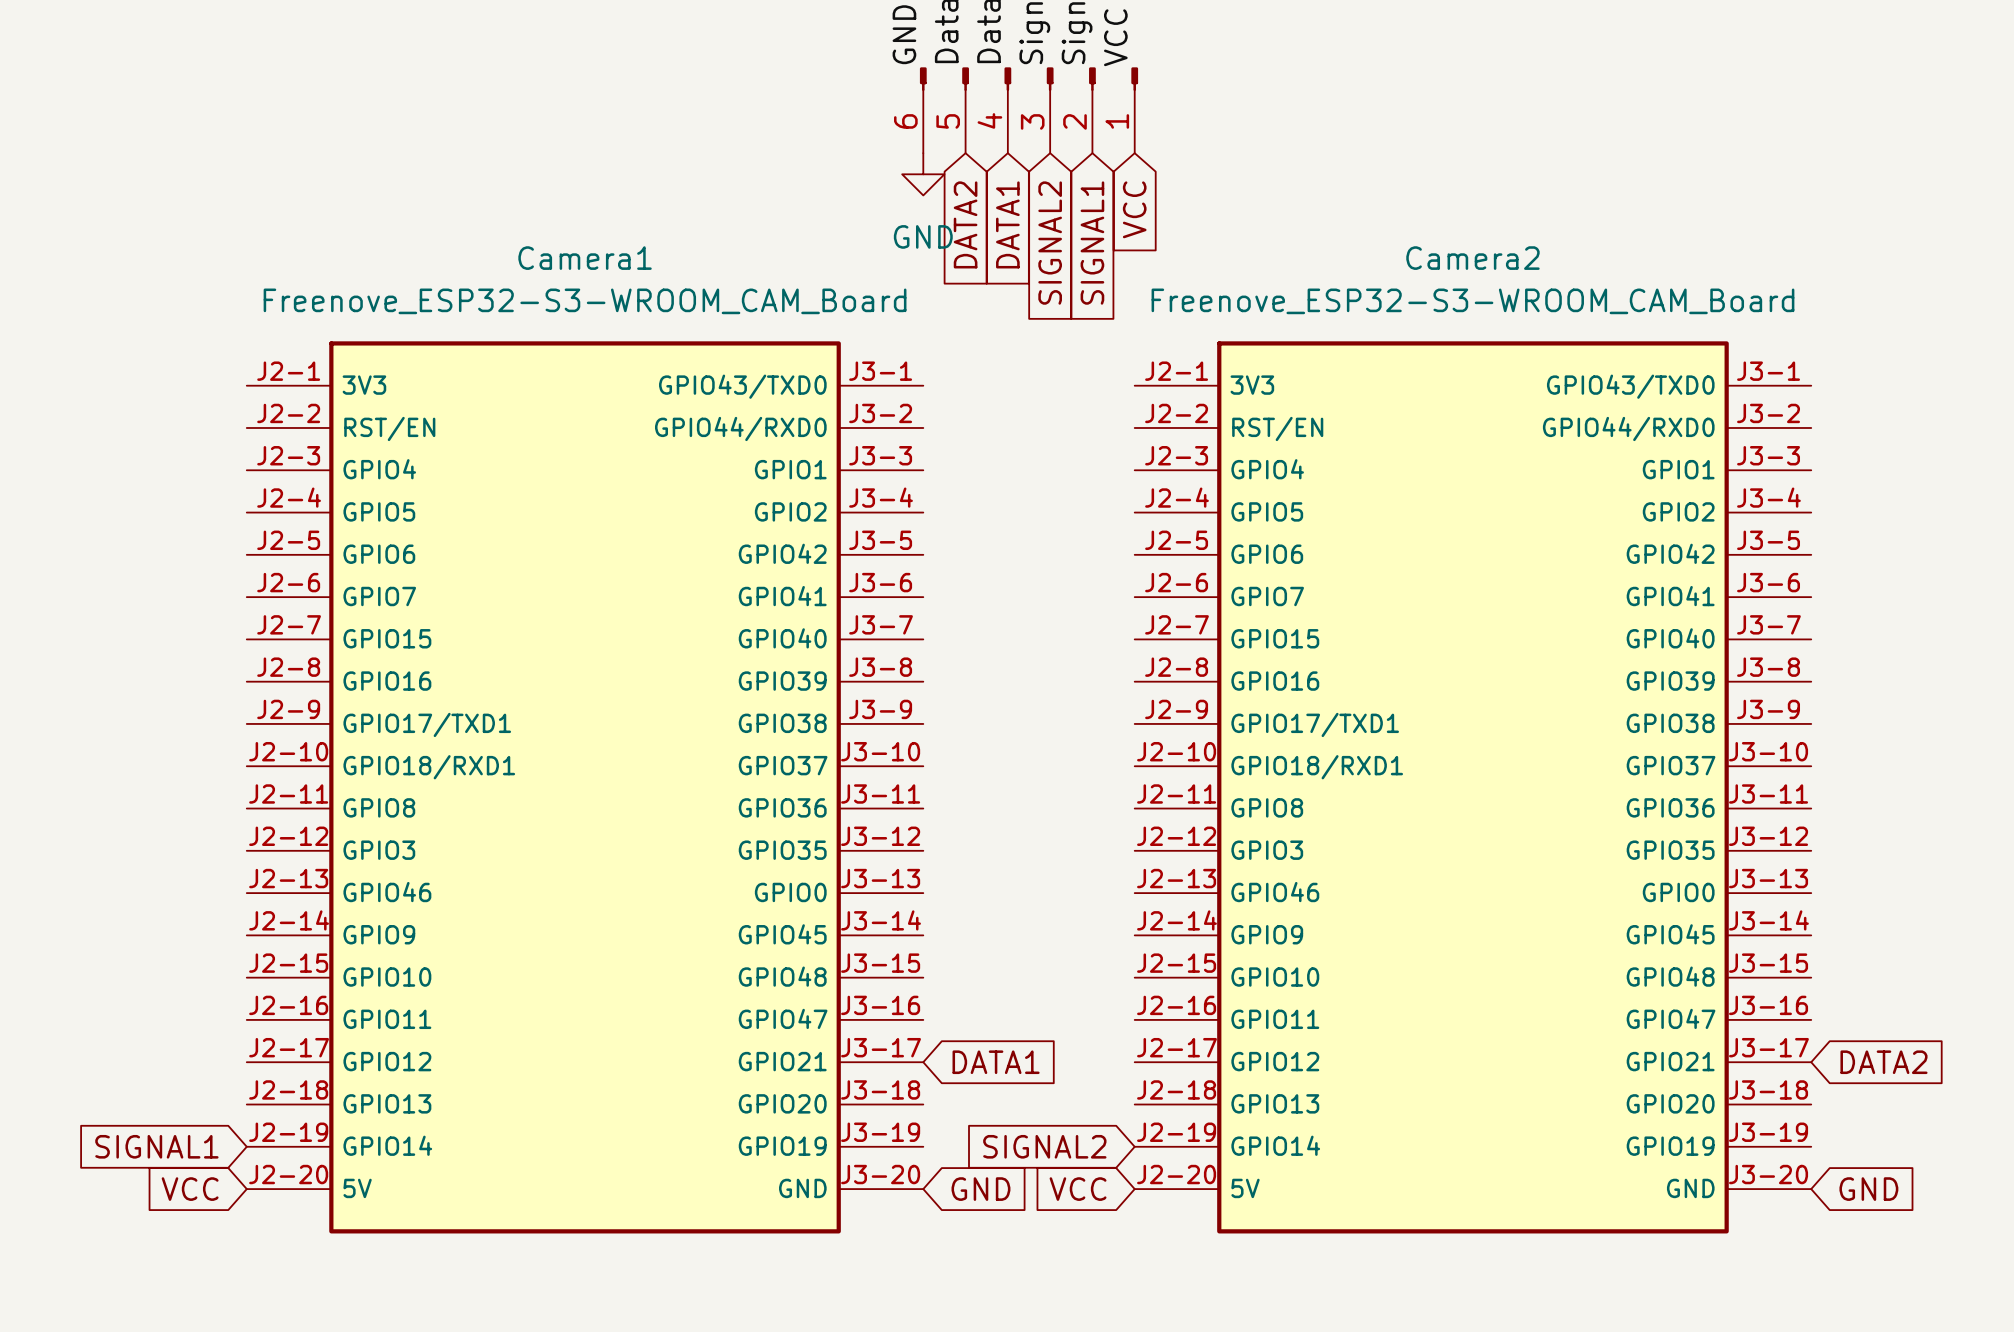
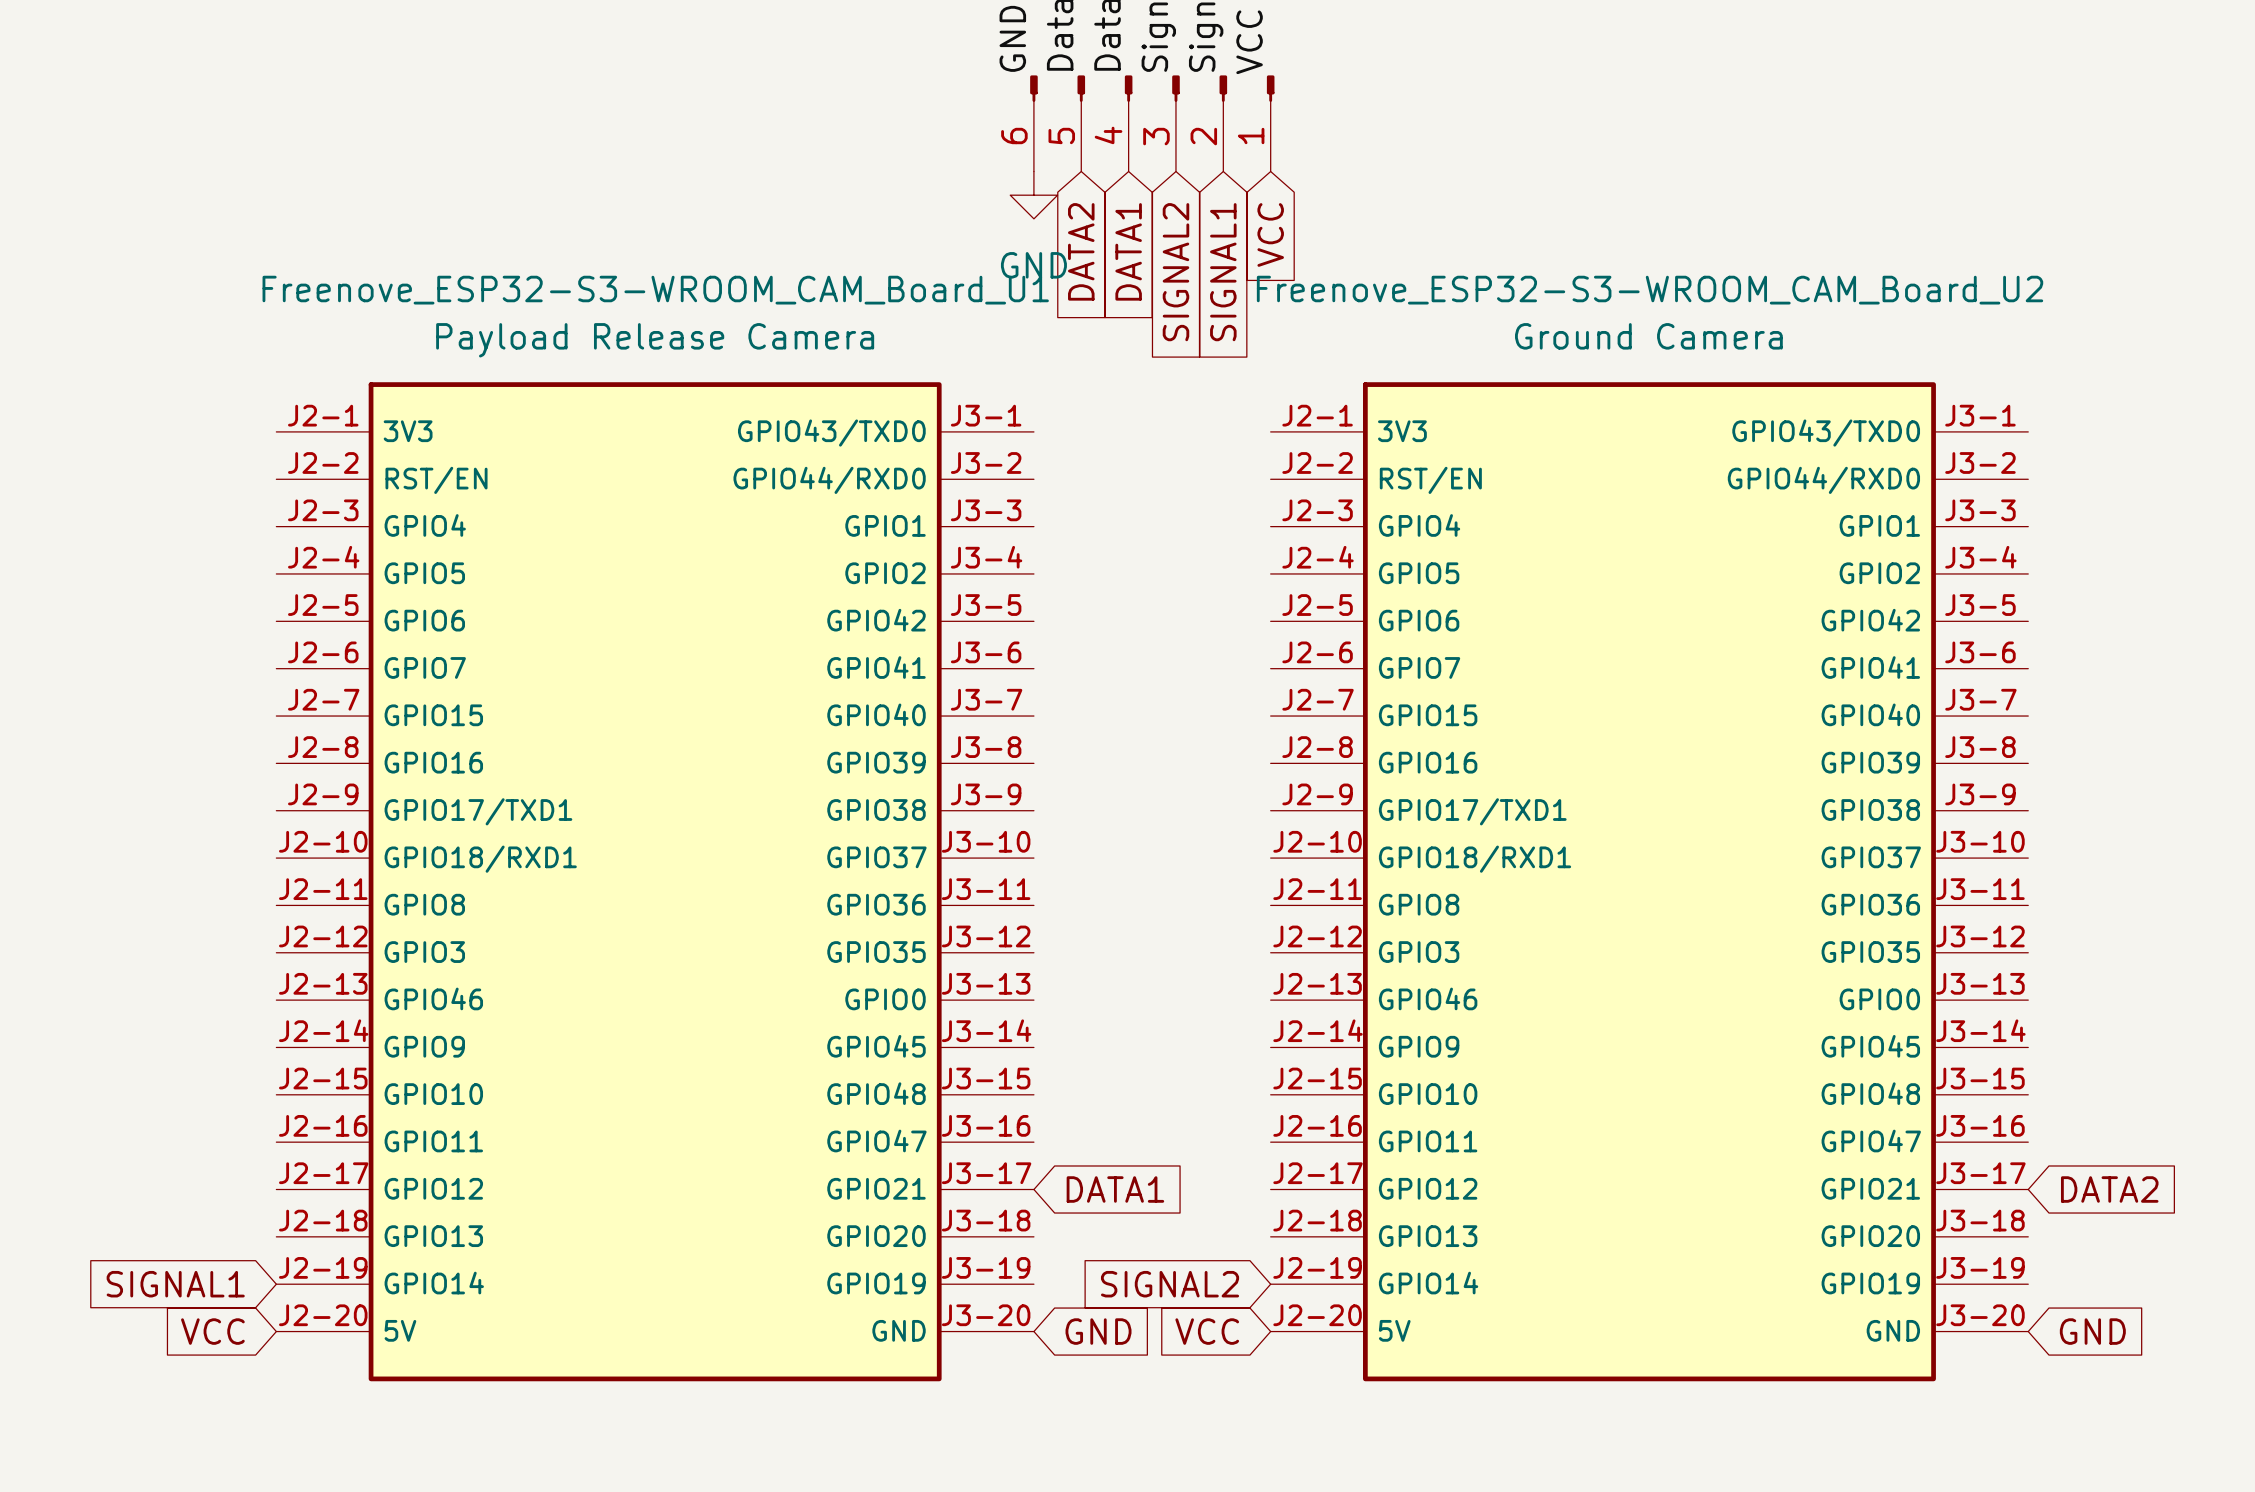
Camera1 name: Camera1 (585, 258) -> Freenove_ESP32-S3-WROOM_CAM_Board_U1 (655, 290)
Camera2 name: Camera2 (1472, 258) -> Freenove_ESP32-S3-WROOM_CAM_Board_U2 (1650, 290)
Camera1 value: Freenove_ESP32-S3-WROOM_CAM_Board (585, 301) -> Payload Release Camera (655, 340)
Camera2 value: Freenove_ESP32-S3-WROOM_CAM_Board (1472, 301) -> Ground Camera (1648, 336)

